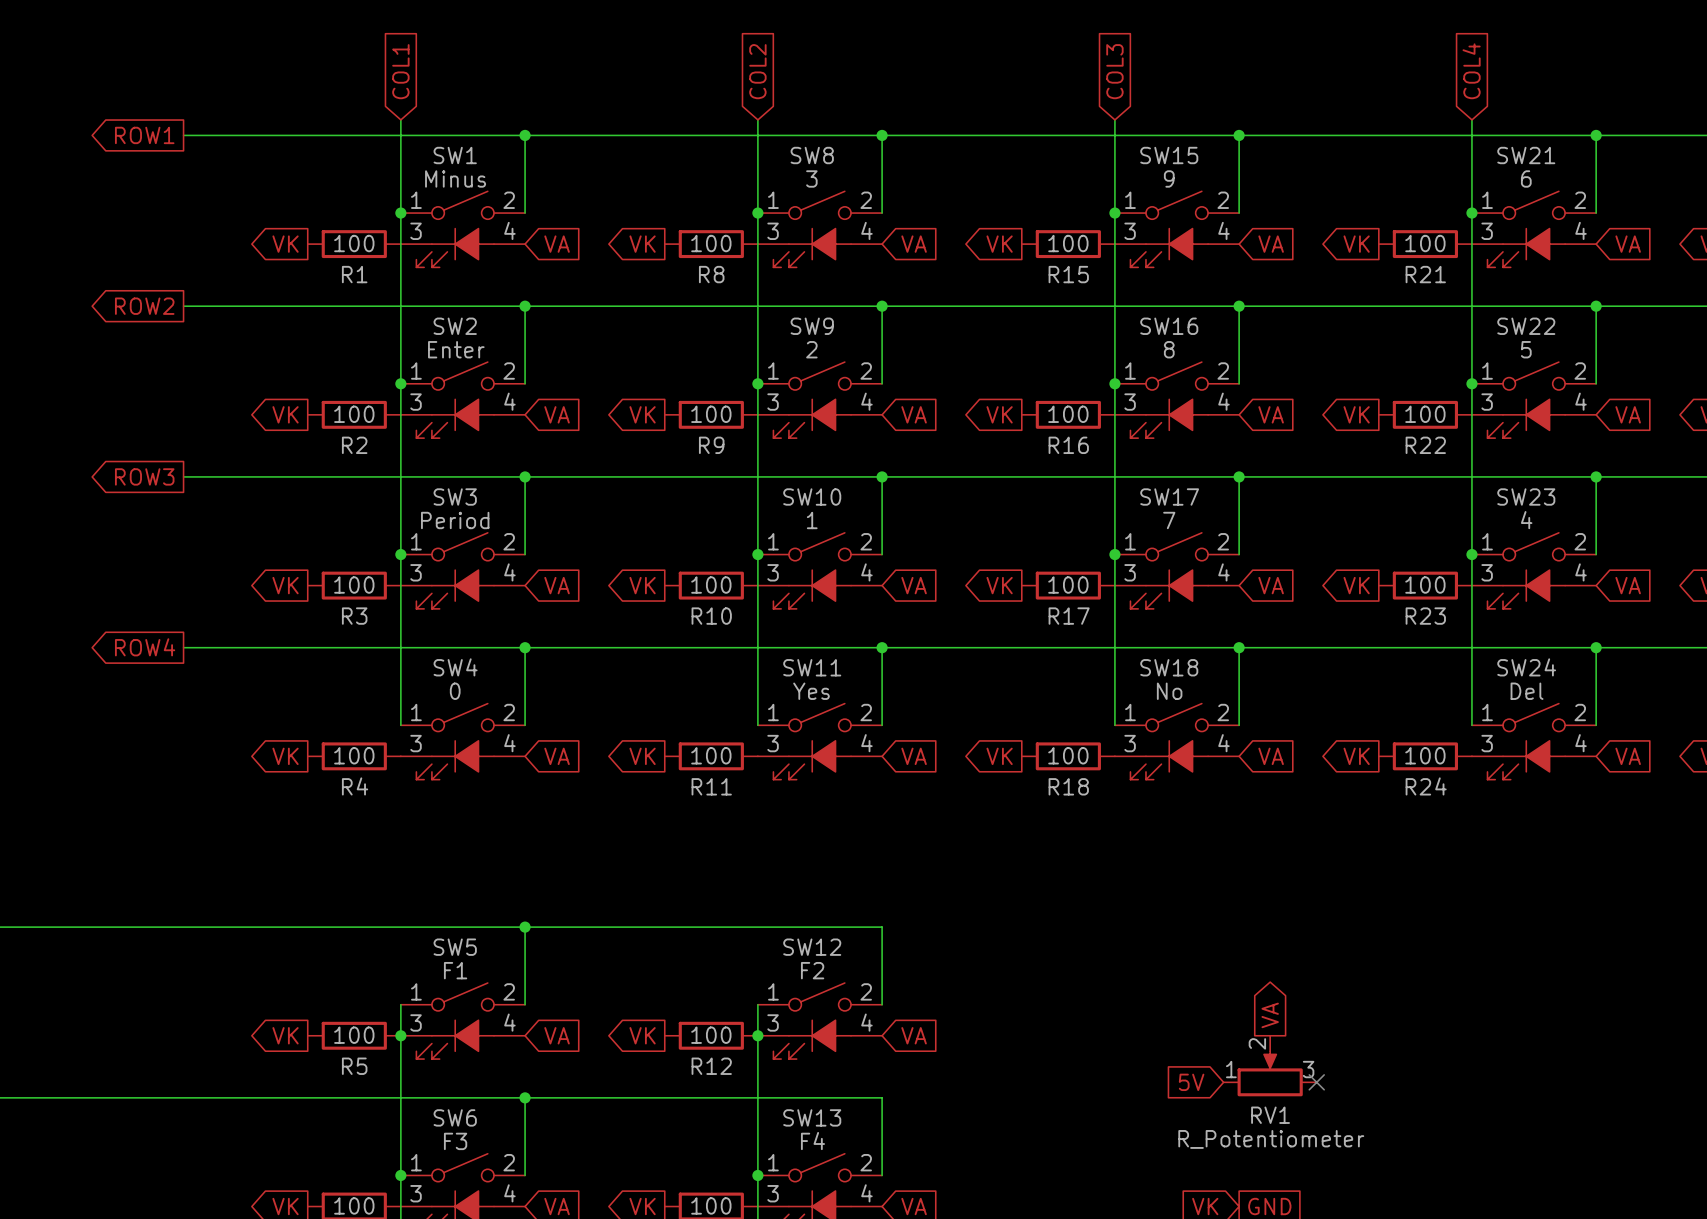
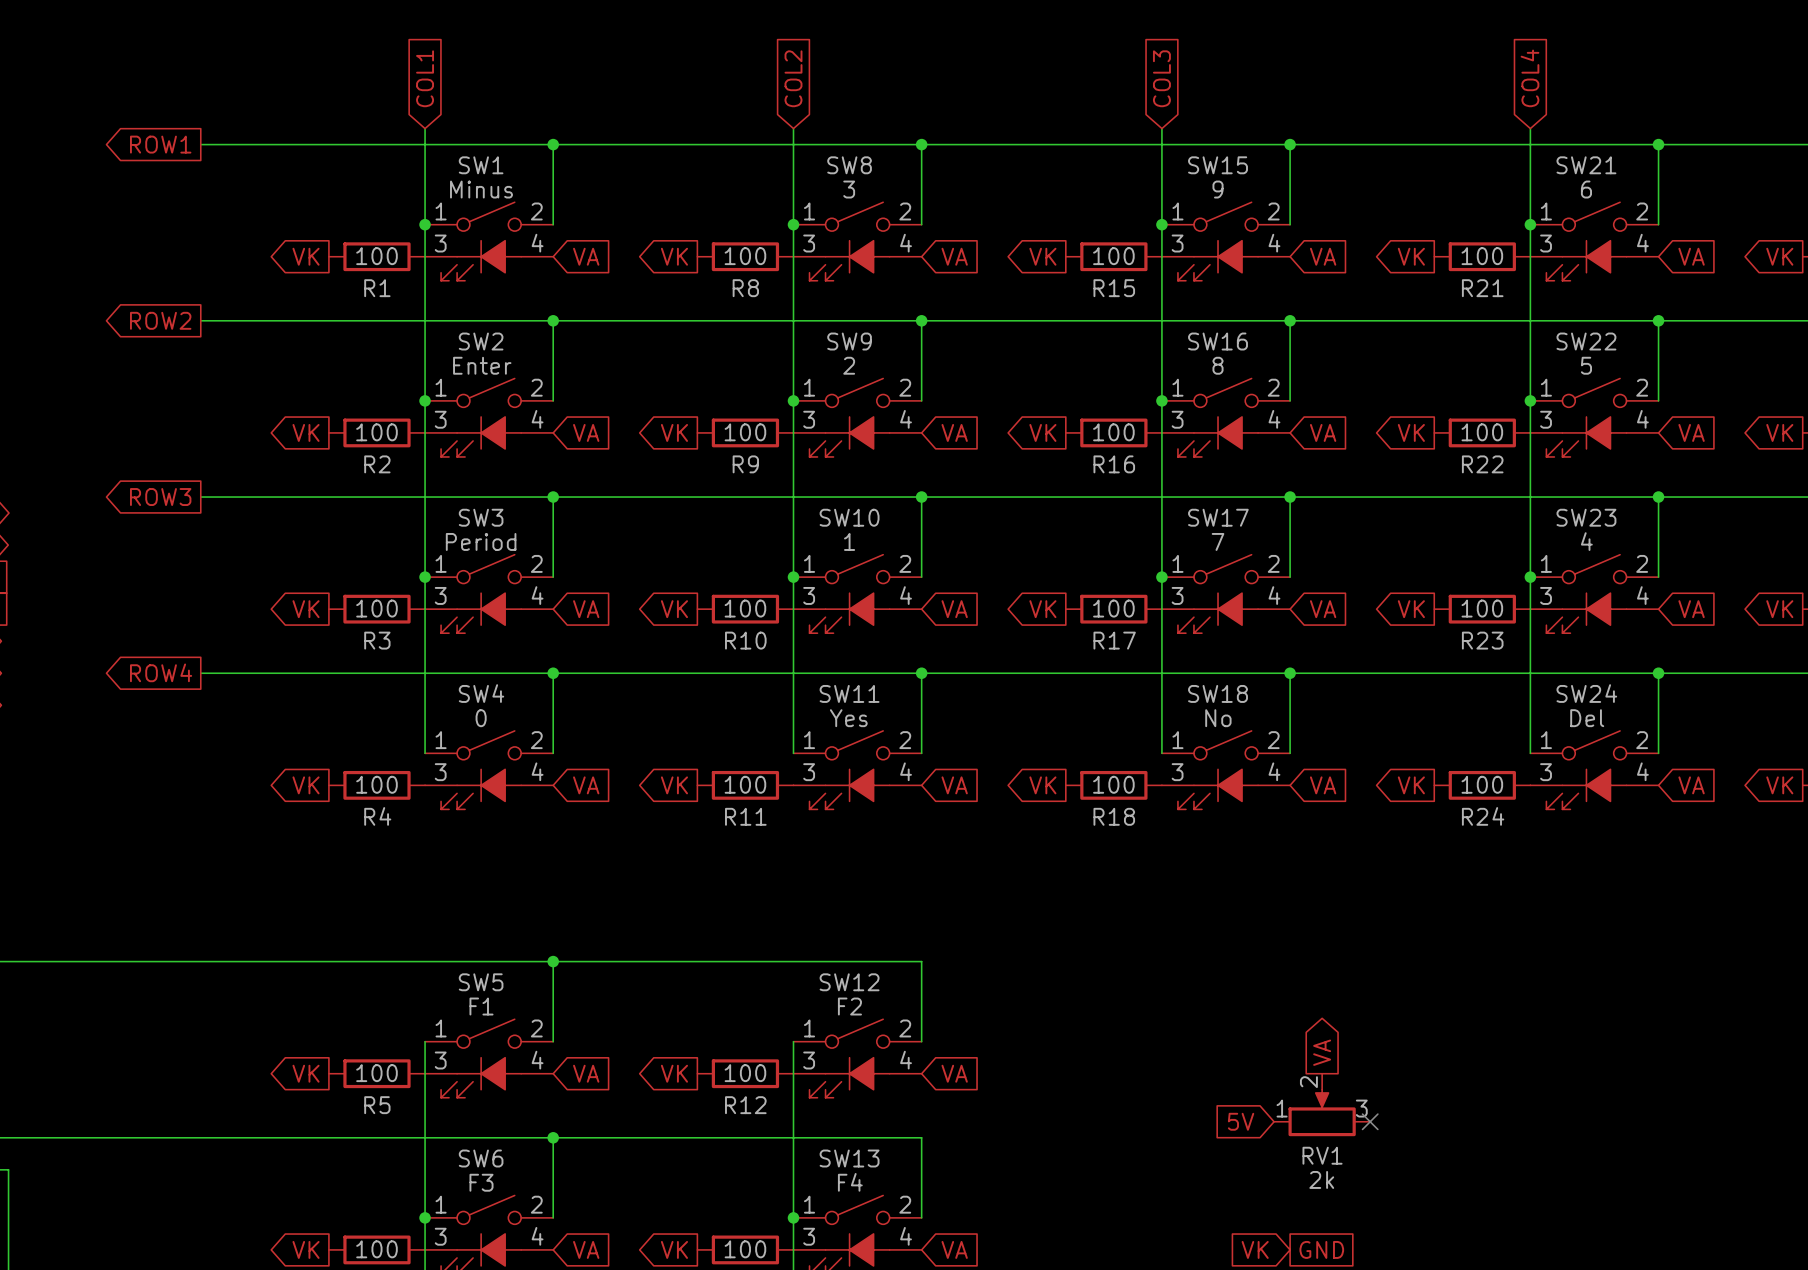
junction: (400, 1035) -> none
junction: (757, 1035) -> none
RV1 value: R_Potentiometer (1271, 1139) -> 2k (1321, 1179)

